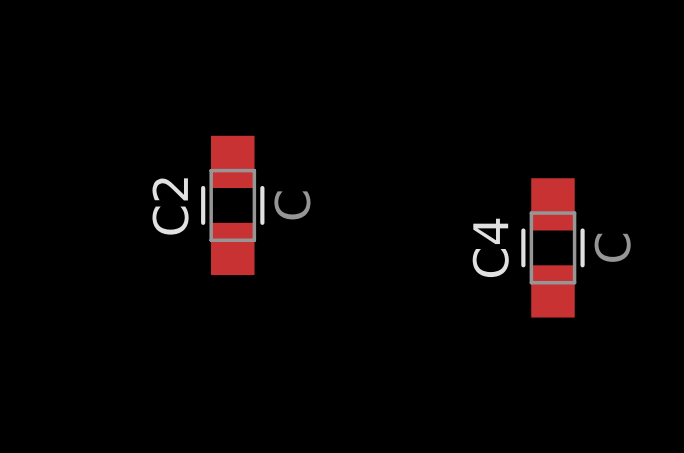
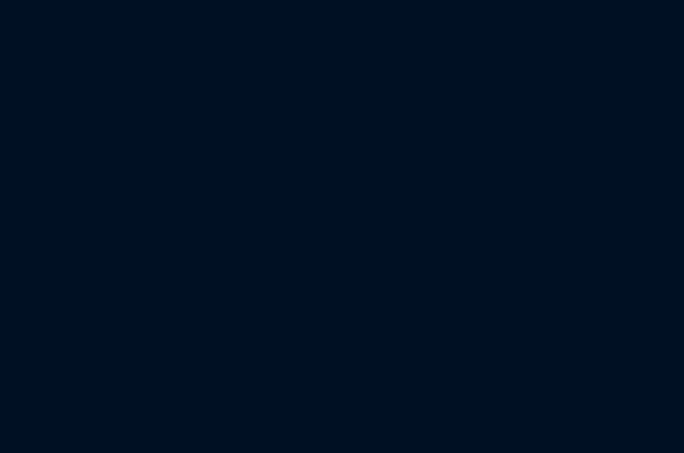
C2: C (232, 205) -> none
C4: C (552, 247) -> none

